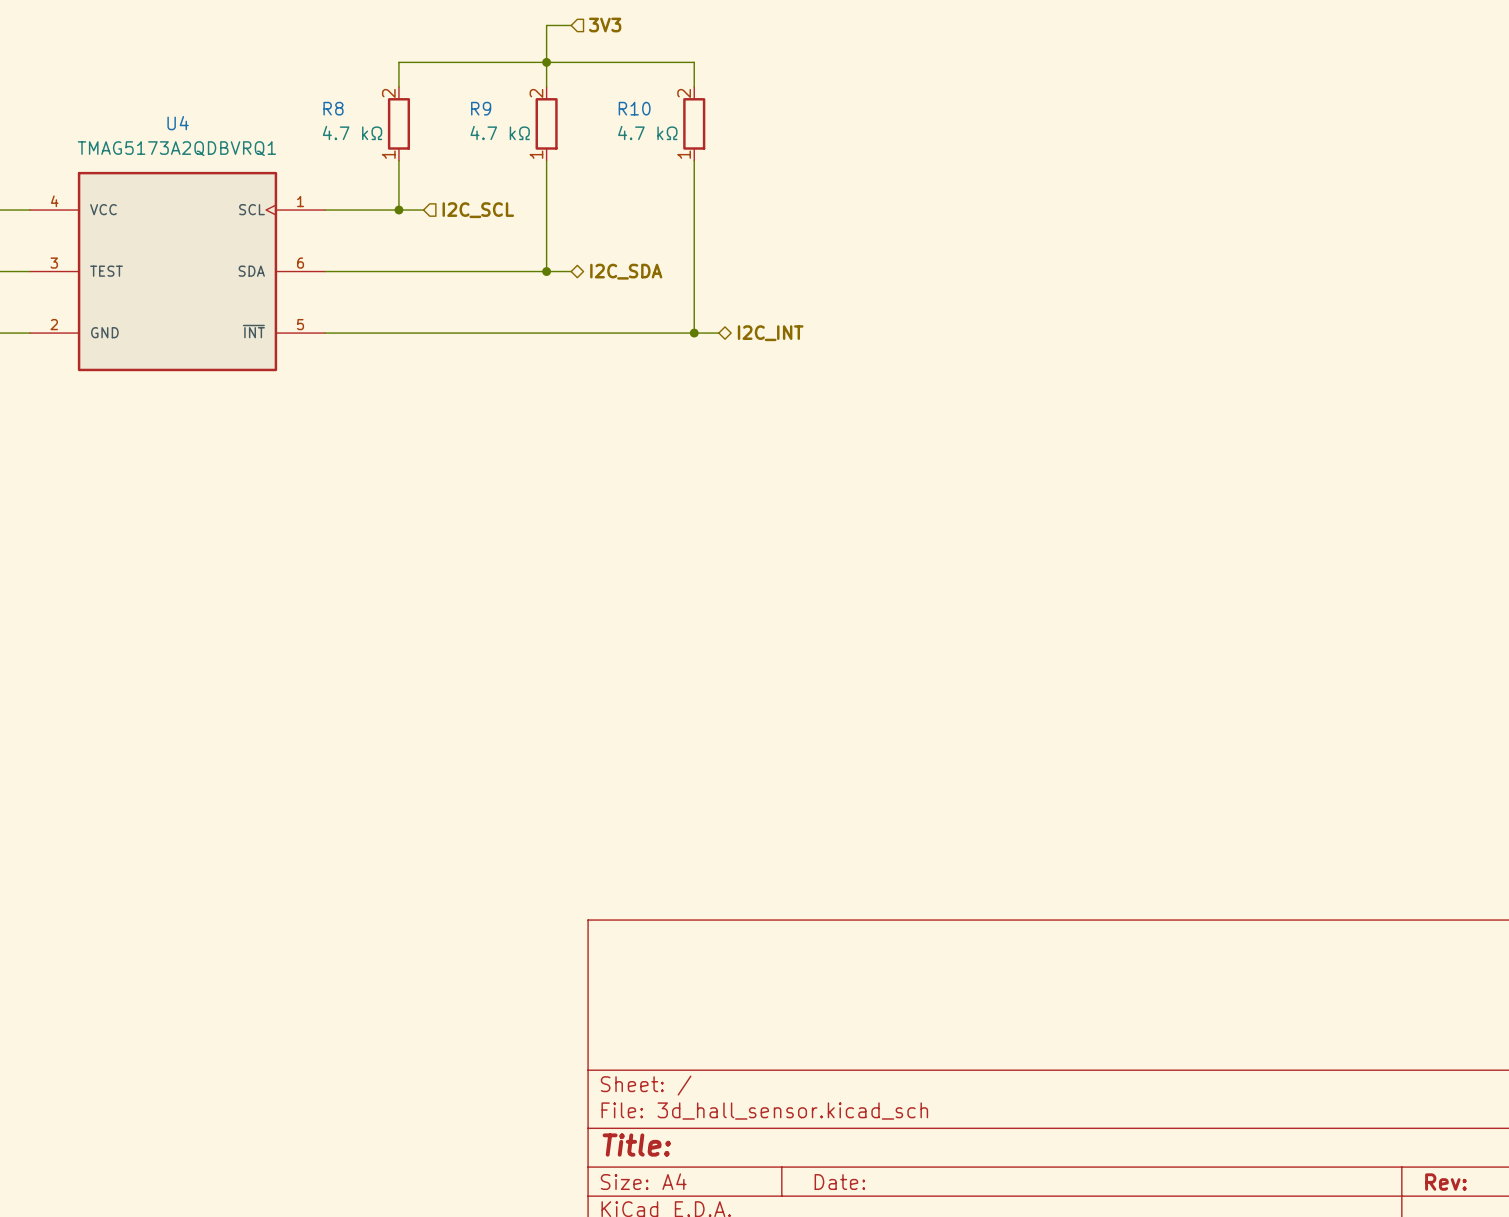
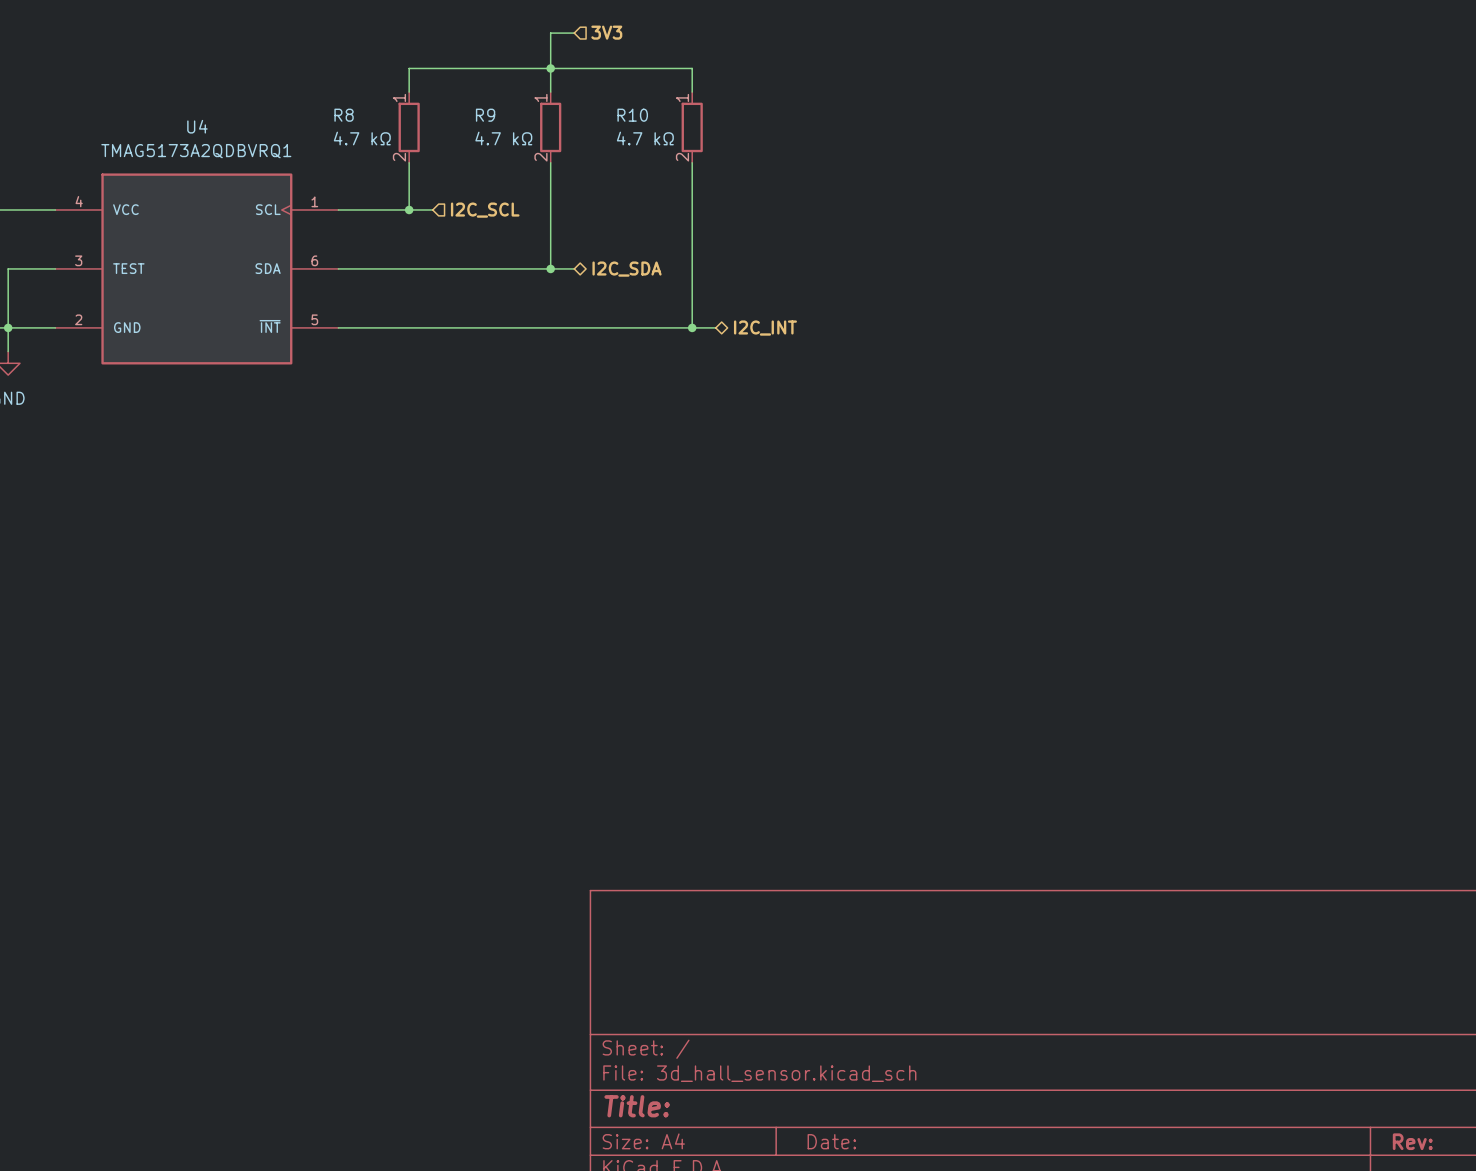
R8 rotation: 0° (398, 123) -> 180° (409, 127)
R9 rotation: 0° (546, 123) -> 180° (550, 127)
R10 rotation: 0° (694, 123) -> 180° (692, 127)

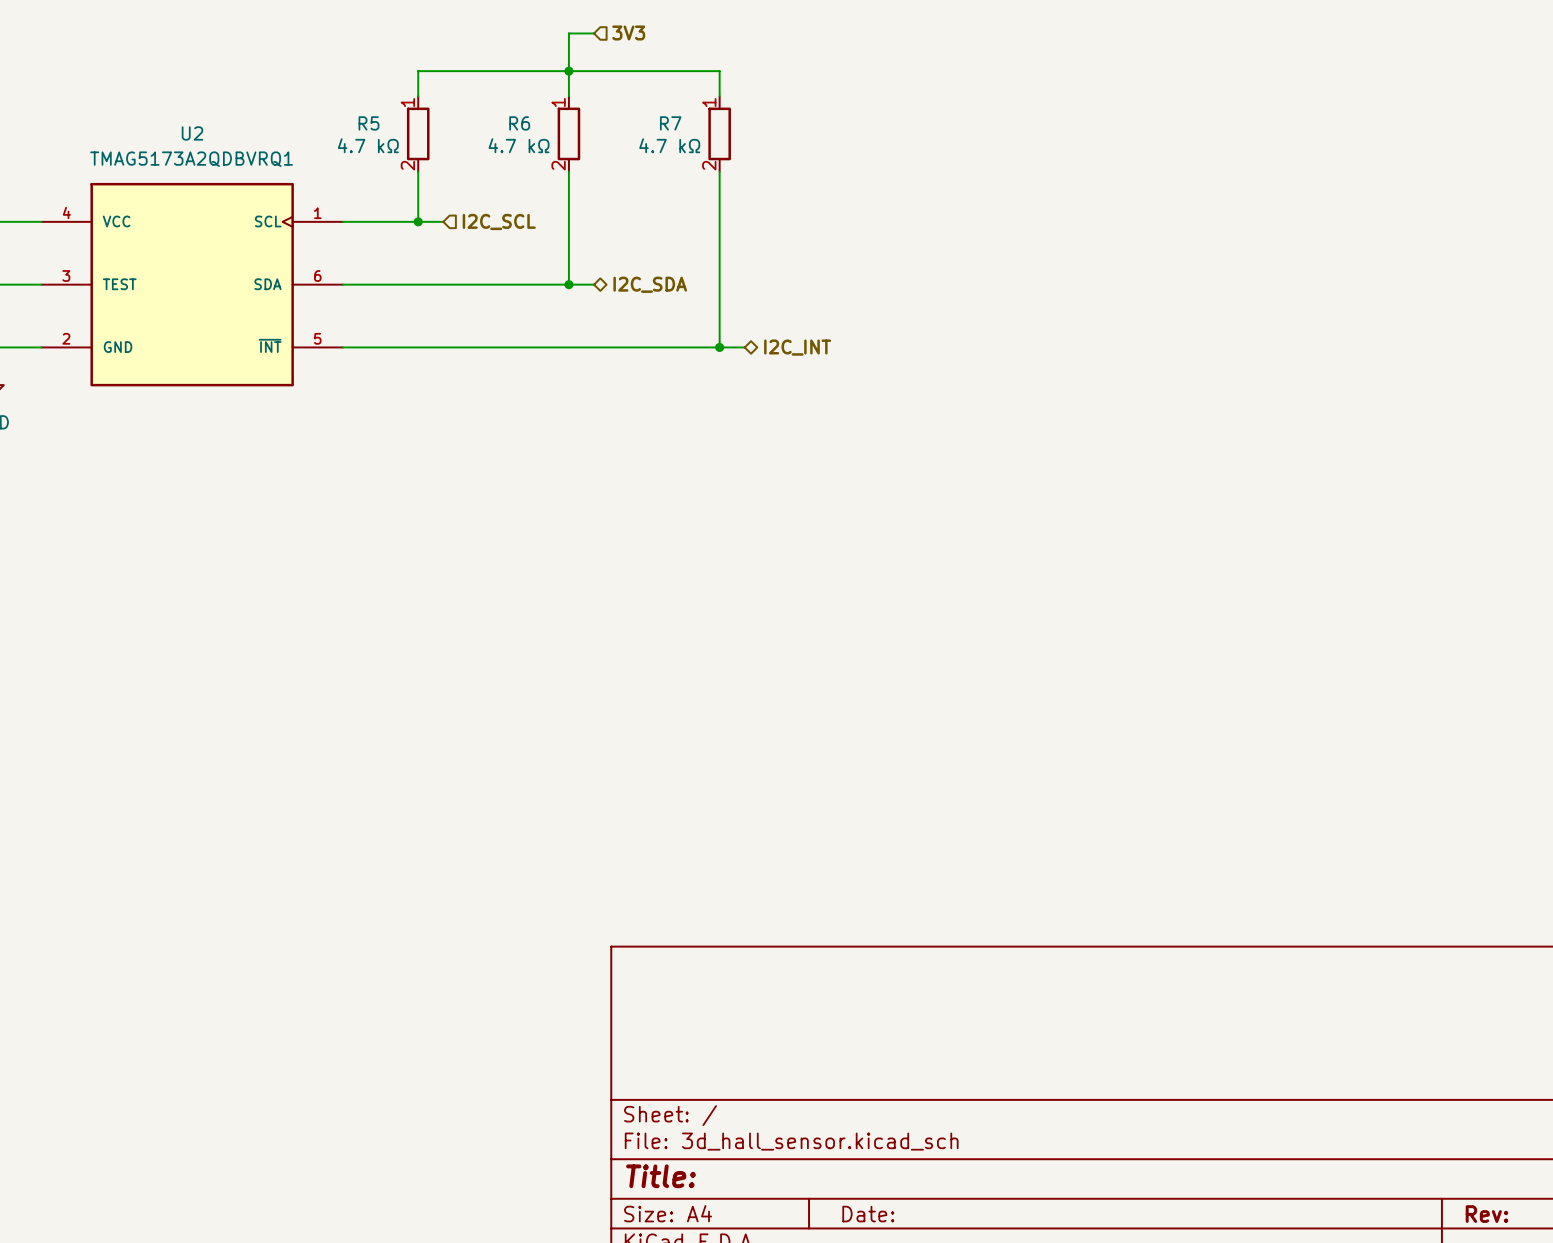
R8 name: R8 (344, 115) -> R5 (368, 123)
R9 name: R9 (485, 115) -> R6 (519, 123)
R10 name: R10 (632, 115) -> R7 (670, 123)
U4 name: U4 (197, 126) -> U2 (192, 133)

